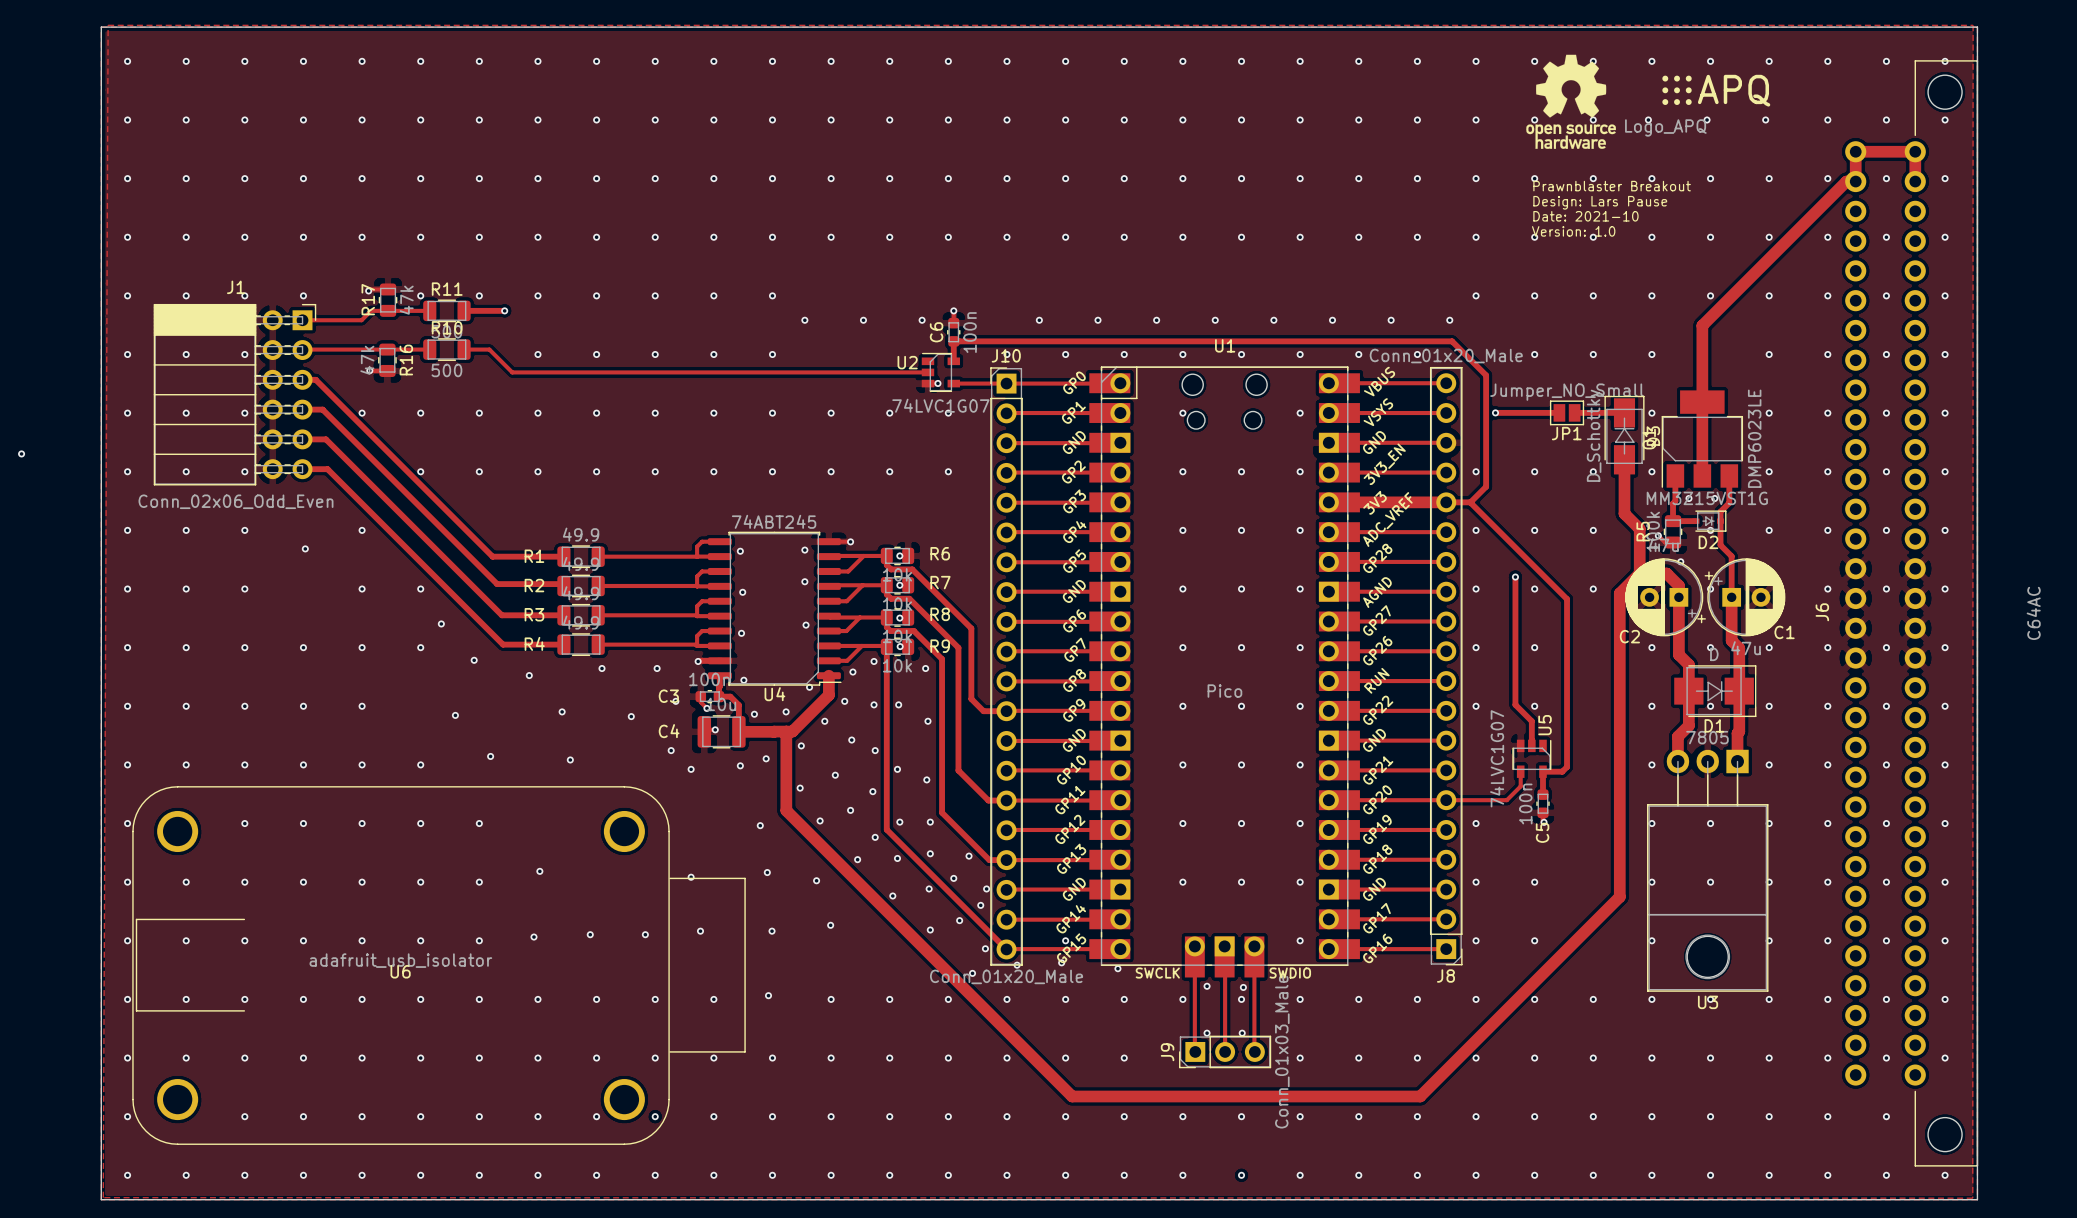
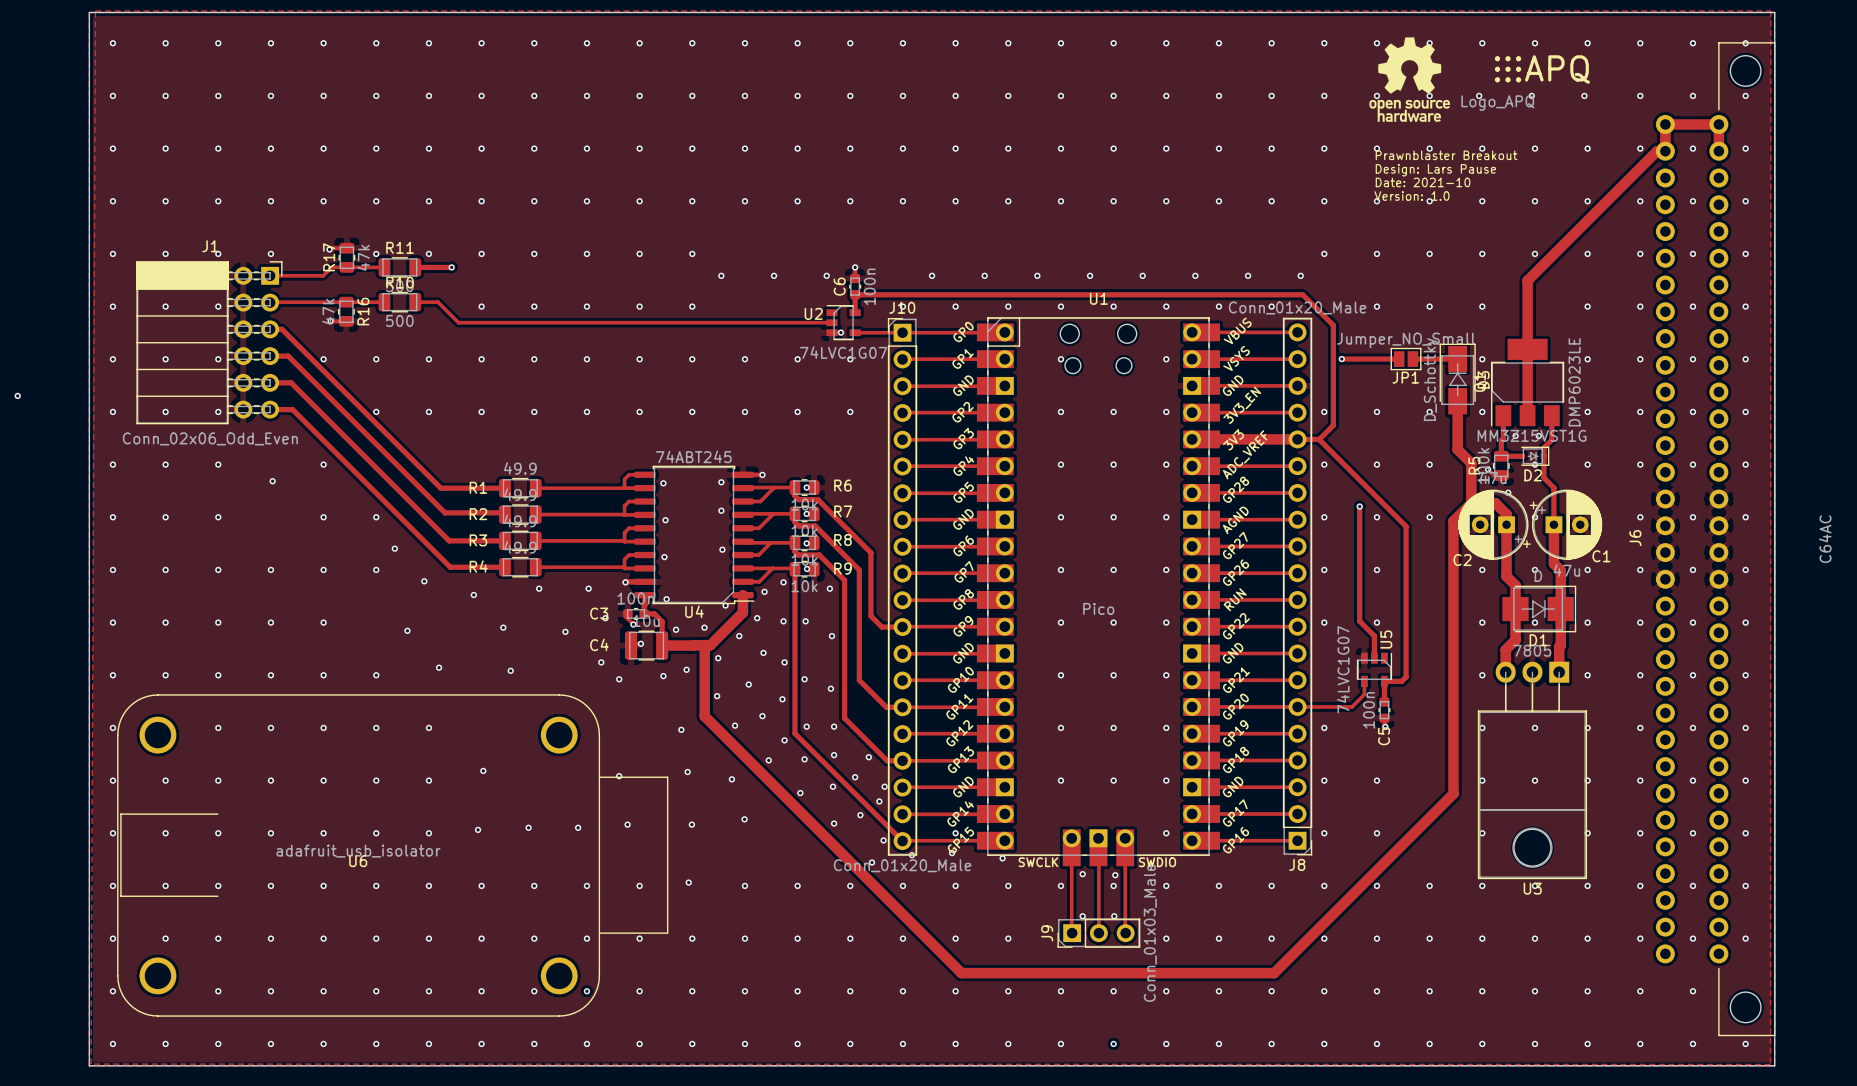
drawing shape: [1625, 74, 1771, 137] -> [1461, 55, 1590, 111]

